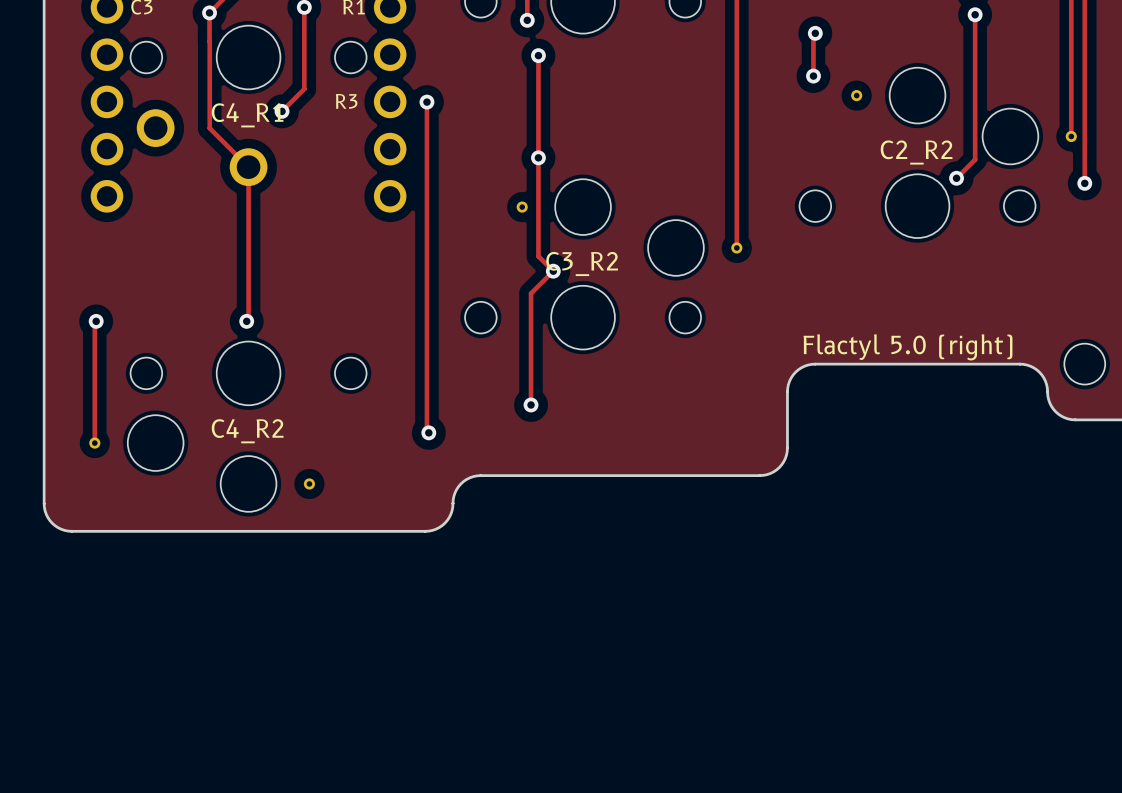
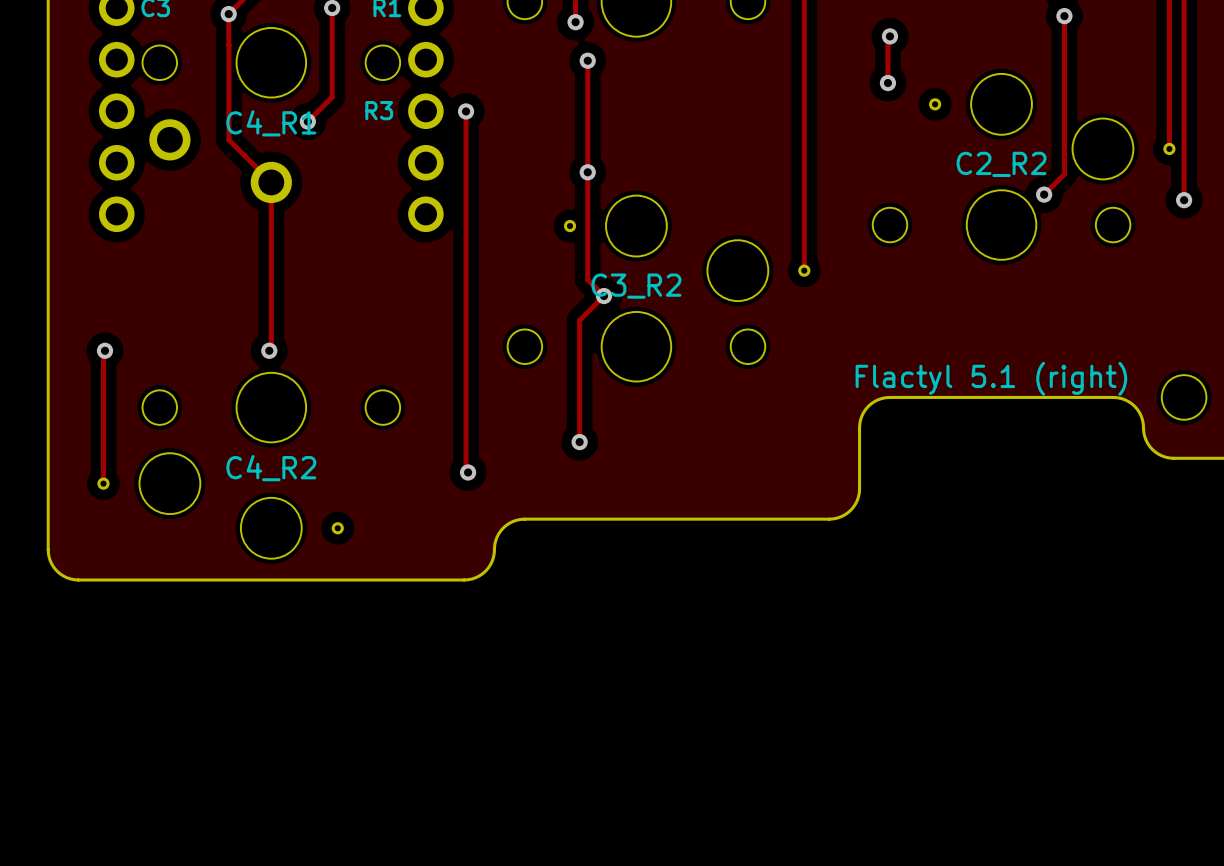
drawing shape: [803, 334, 1013, 361] -> [855, 361, 1128, 396]

